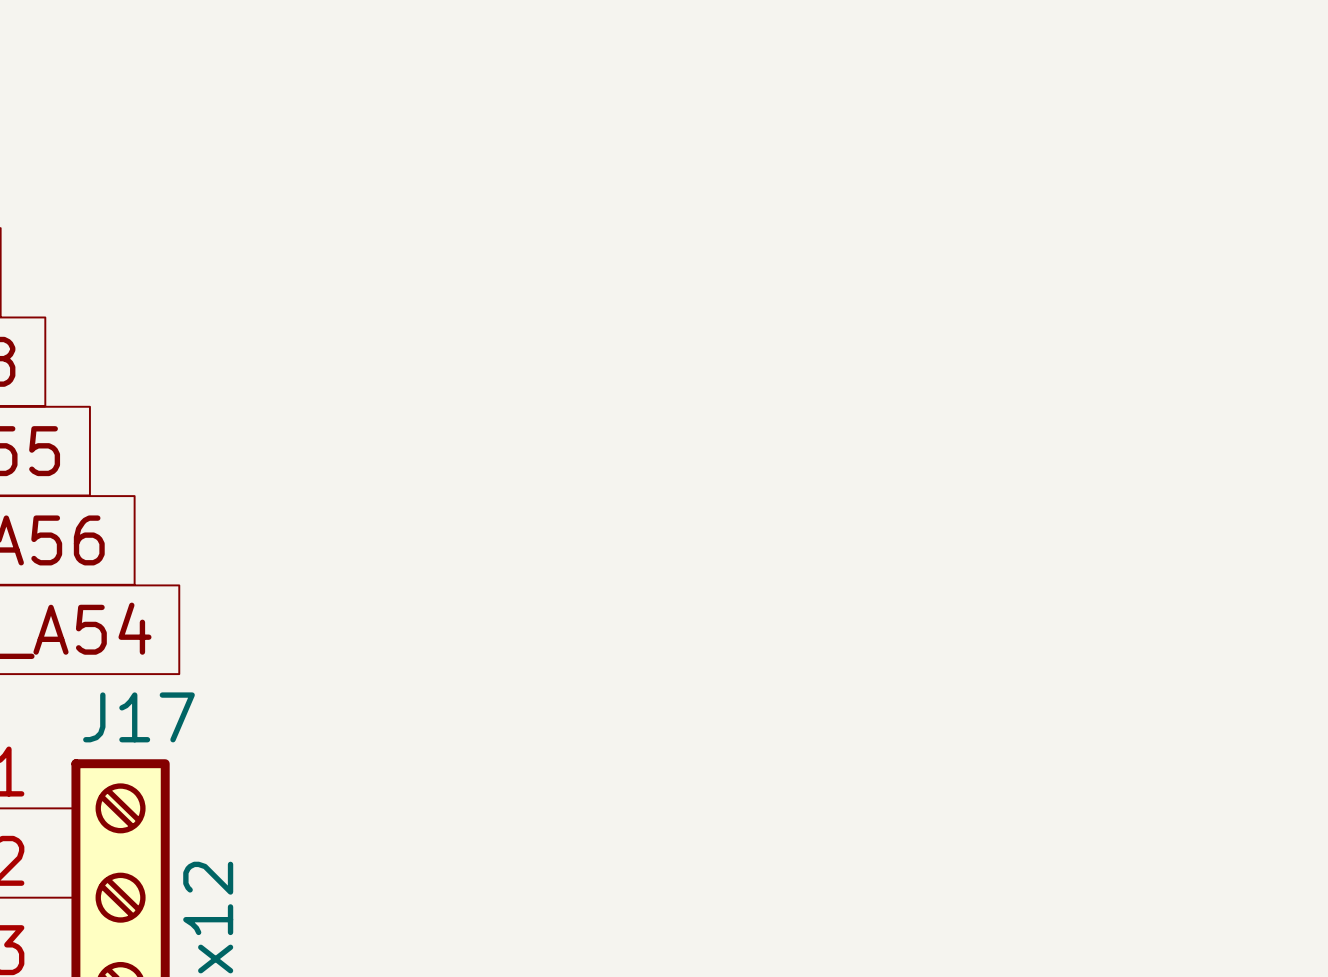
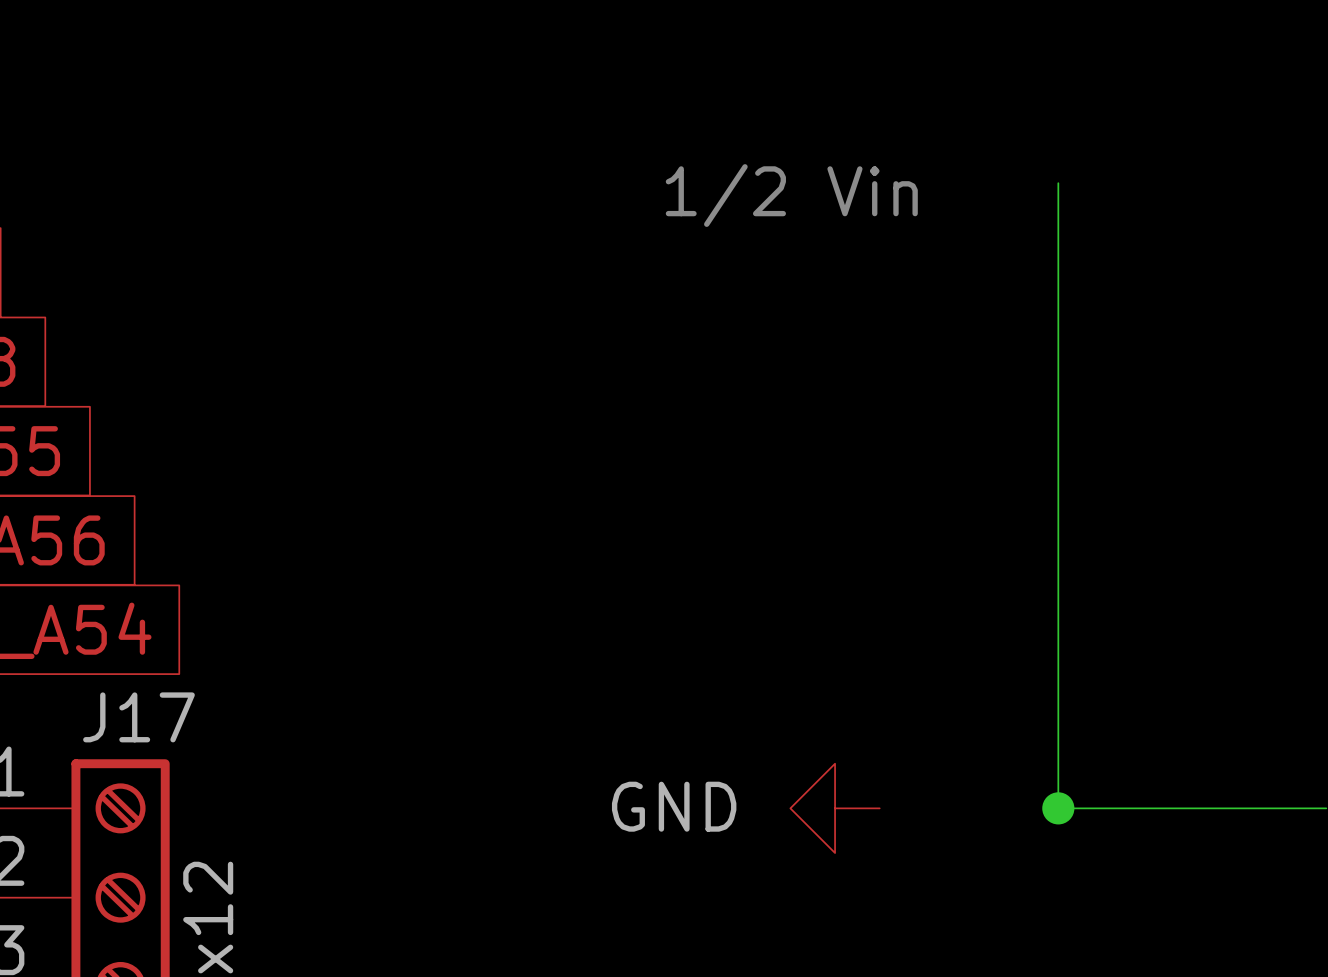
wire: none -> (1058, 183) (1058, 808) (1326, 808)
text: none -> 1/2 Vin (791, 195)
power symbol: none -> GND (835, 808)
junction: none -> (1058, 808)

